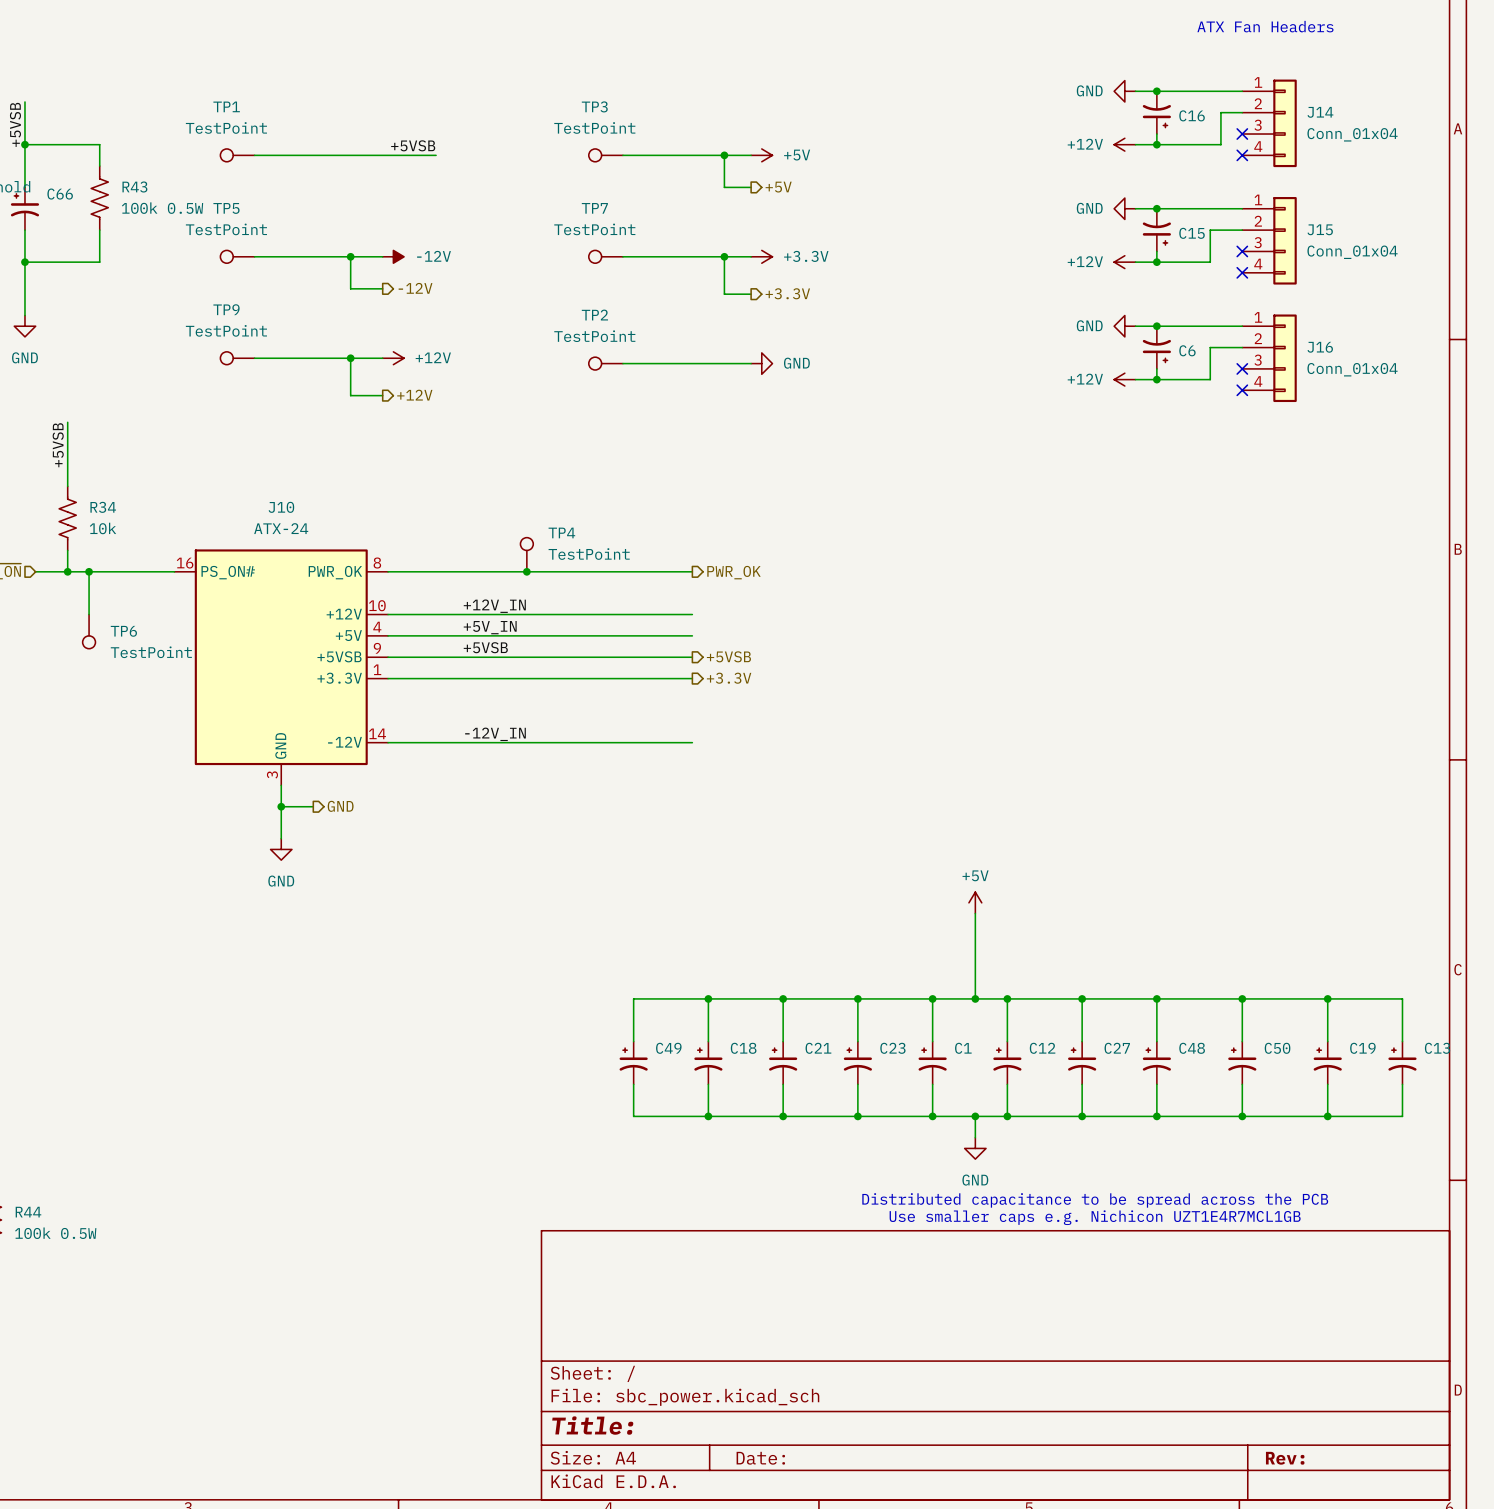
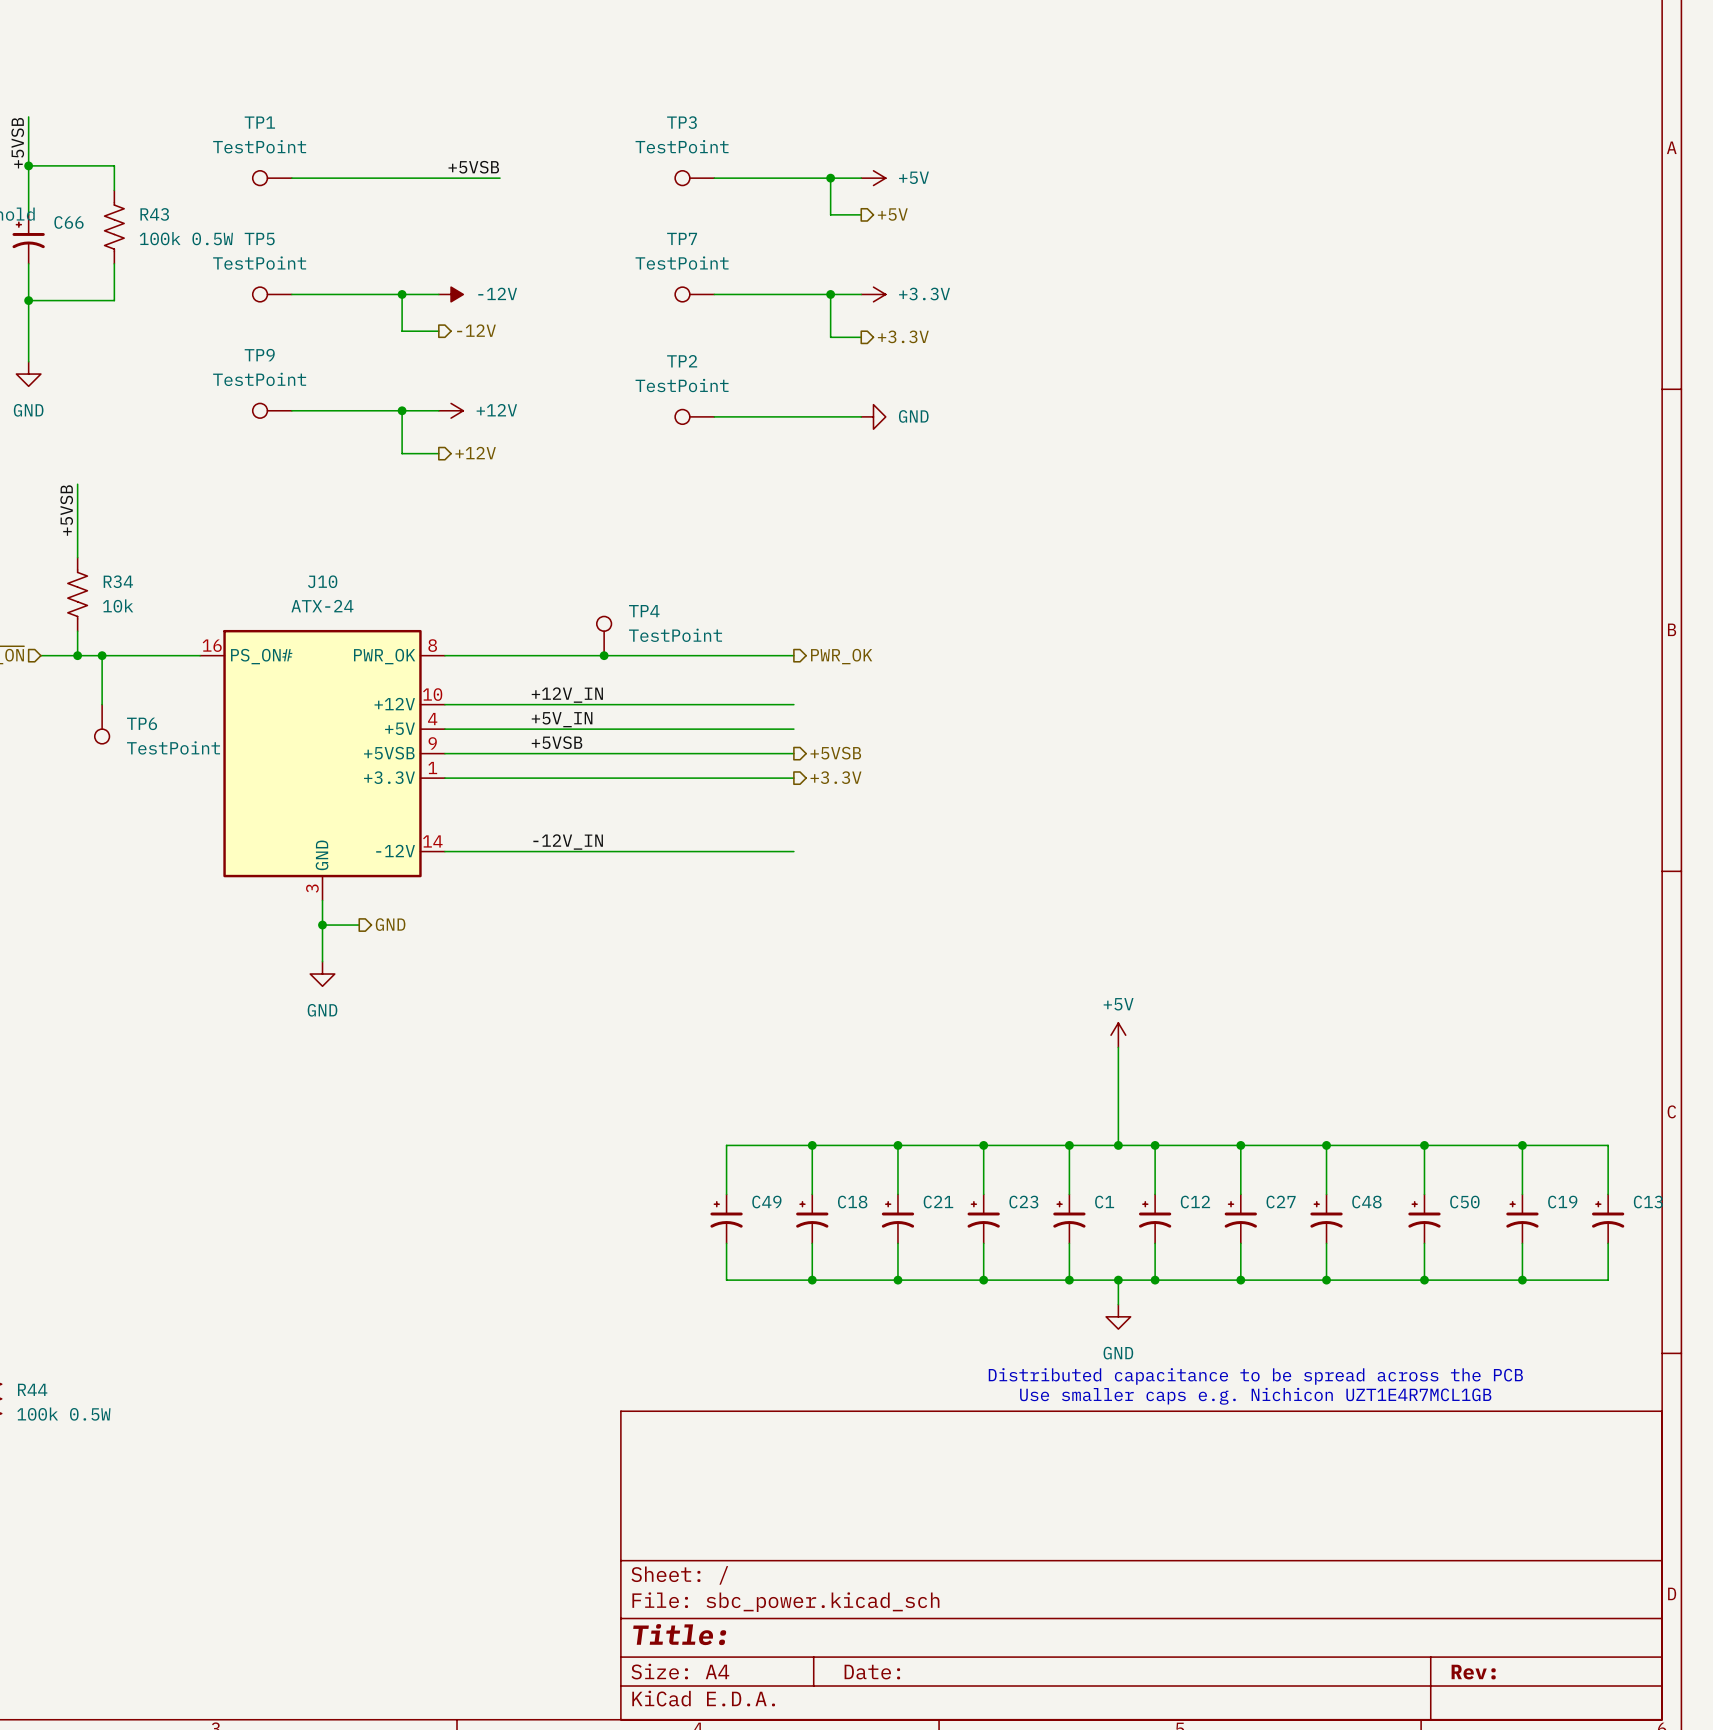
text: ATX Fan Headers (1265, 26) -> none
power symbol: GND (1124, 91) -> none
wire: (1135, 91) (1242, 91) -> none
junction: (1156, 91) -> none
C16: (1156, 112) -> none
wire: (1242, 112) (1220, 112) (1220, 144) (1135, 144) -> none
J14: Conn_01x04 (1269, 123) -> none
wire: (1156, 134) (1156, 144) -> none
no-connect mark: (1242, 134) -> none
power symbol: +12V (1124, 144) -> none
junction: (1156, 144) -> none
no-connect mark: (1242, 155) -> none
power symbol: GND (1124, 208) -> none
wire: (1135, 208) (1242, 208) -> none
junction: (1156, 208) -> none
C15: (1156, 230) -> none
wire: (1242, 230) (1210, 230) (1210, 262) (1135, 262) -> none
J15: Conn_01x04 (1269, 240) -> none
wire: (1156, 251) (1156, 262) -> none
no-connect mark: (1242, 251) -> none
power symbol: +12V (1124, 262) -> none
junction: (1156, 262) -> none
no-connect mark: (1242, 272) -> none
power symbol: GND (1124, 326) -> none
wire: (1135, 326) (1242, 326) -> none
junction: (1156, 326) -> none
C6: (1156, 347) -> none
wire: (1242, 347) (1210, 347) (1210, 379) (1135, 379) -> none
J16: Conn_01x04 (1269, 358) -> none
wire: (1156, 368) (1156, 379) -> none
no-connect mark: (1242, 368) -> none
power symbol: +12V (1124, 379) -> none
junction: (1156, 379) -> none
no-connect mark: (1242, 390) -> none

